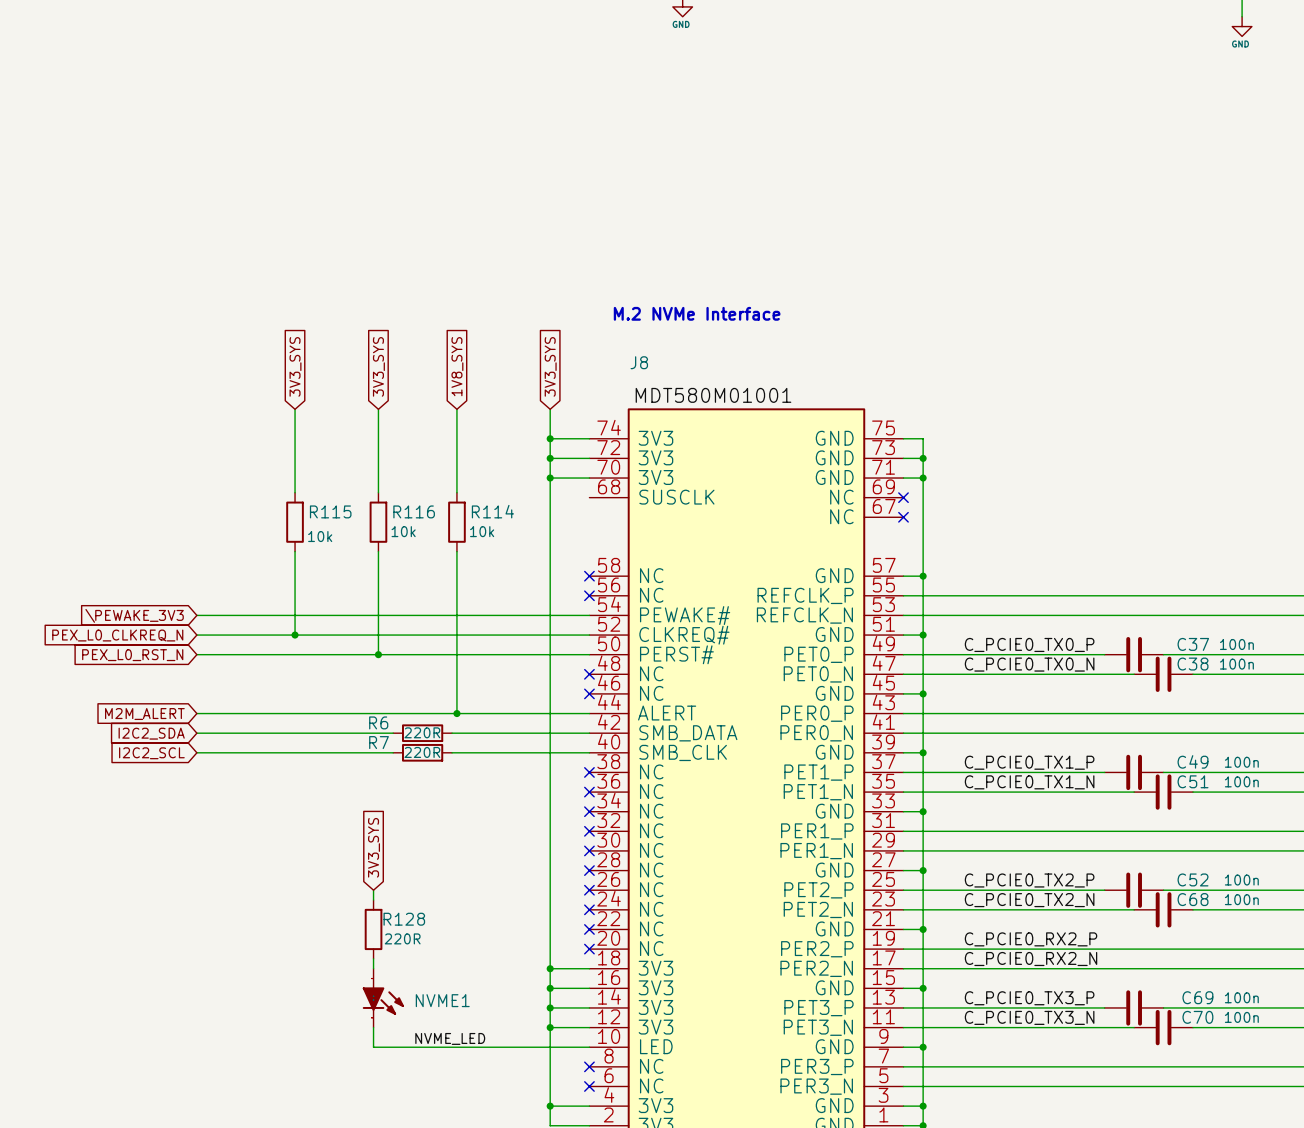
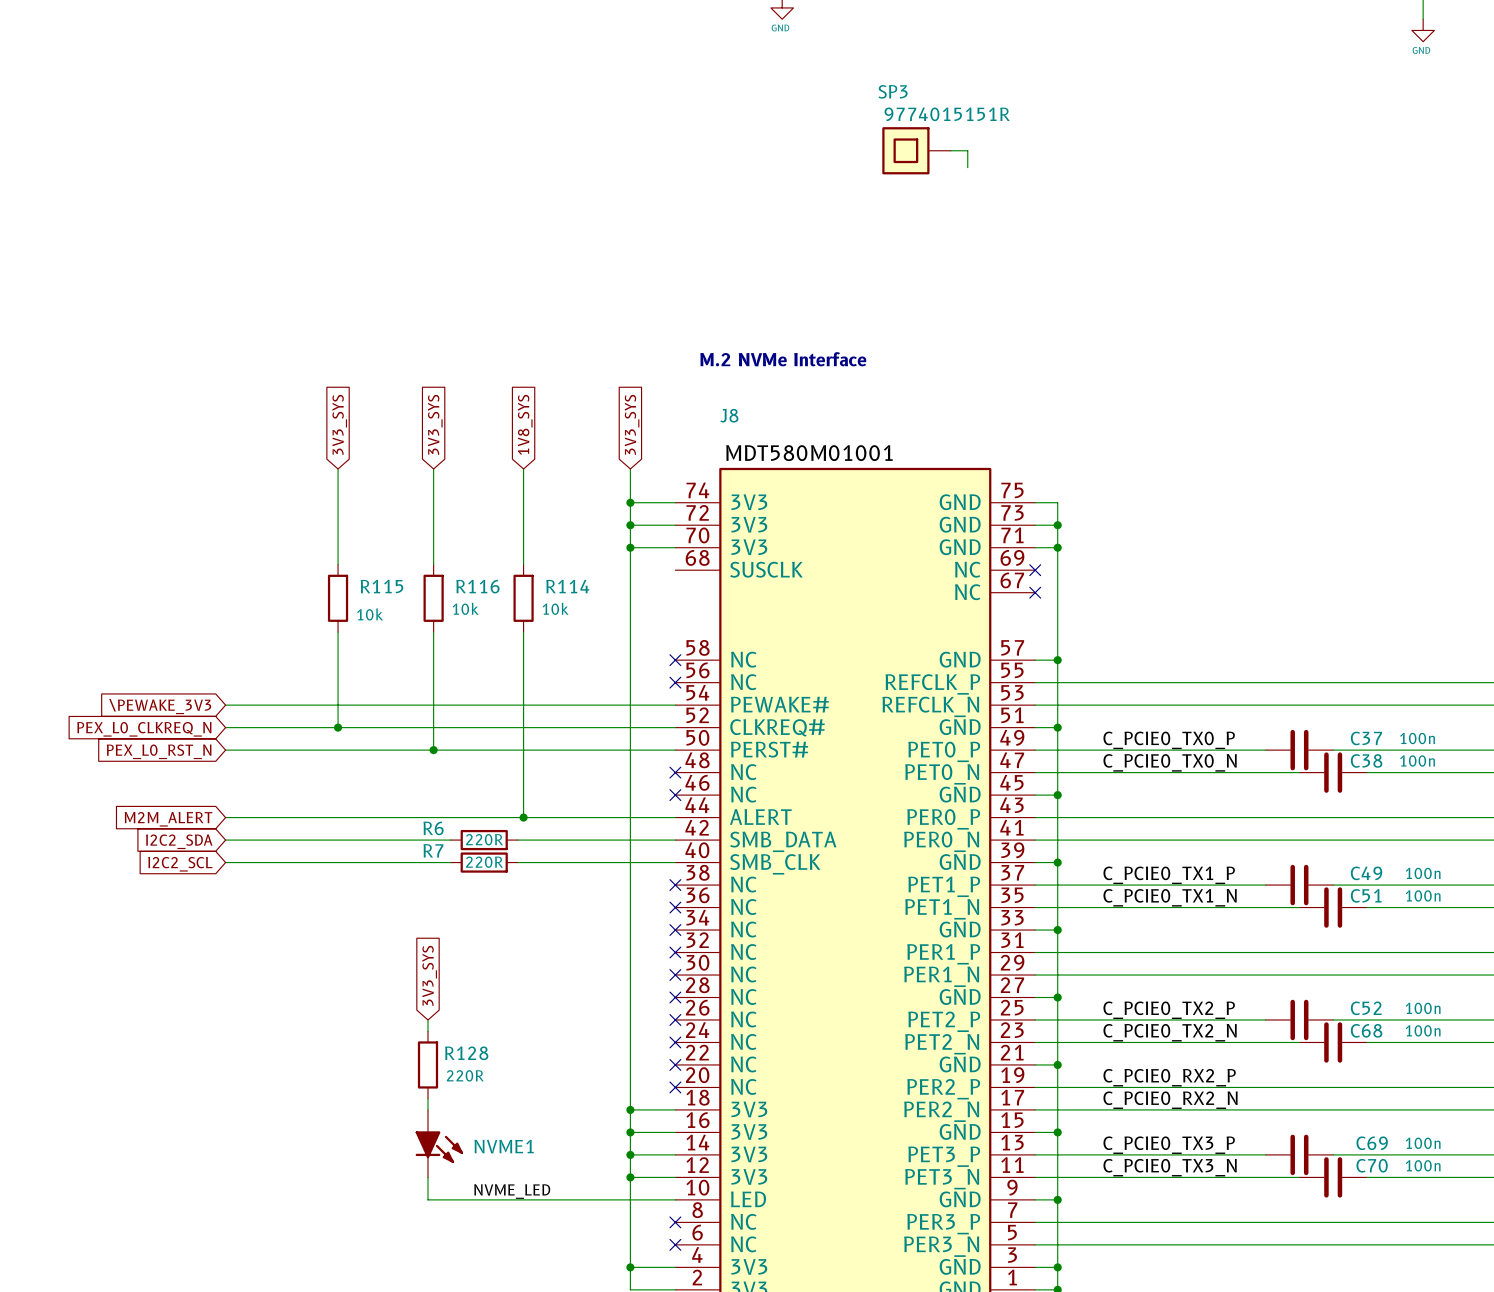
SP3: none -> 9774015151R (916, 150)
wire: none -> (950, 150) (967, 150) (967, 167)

